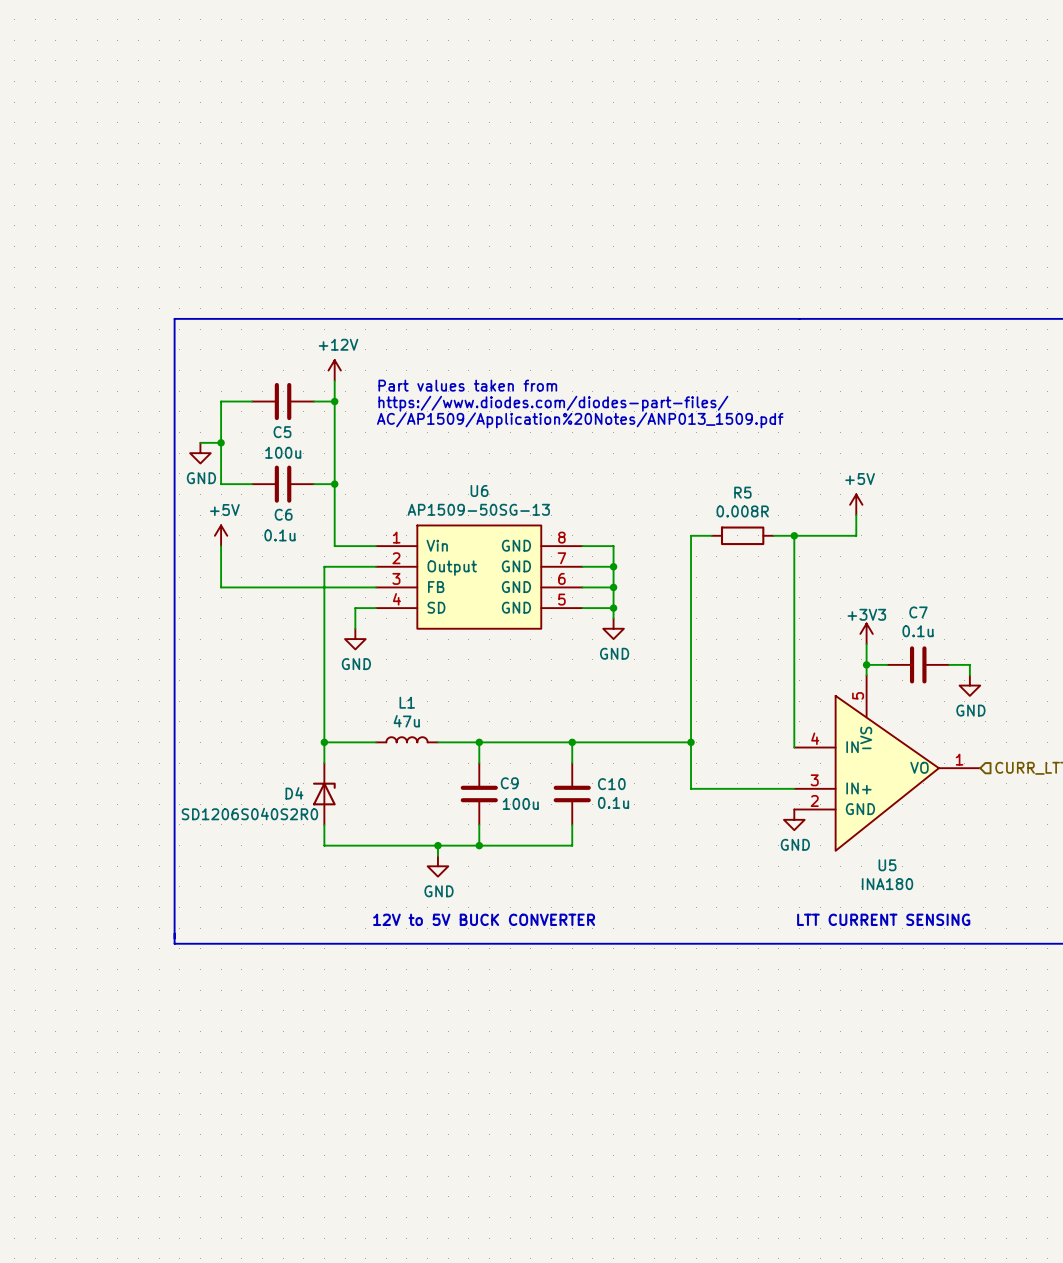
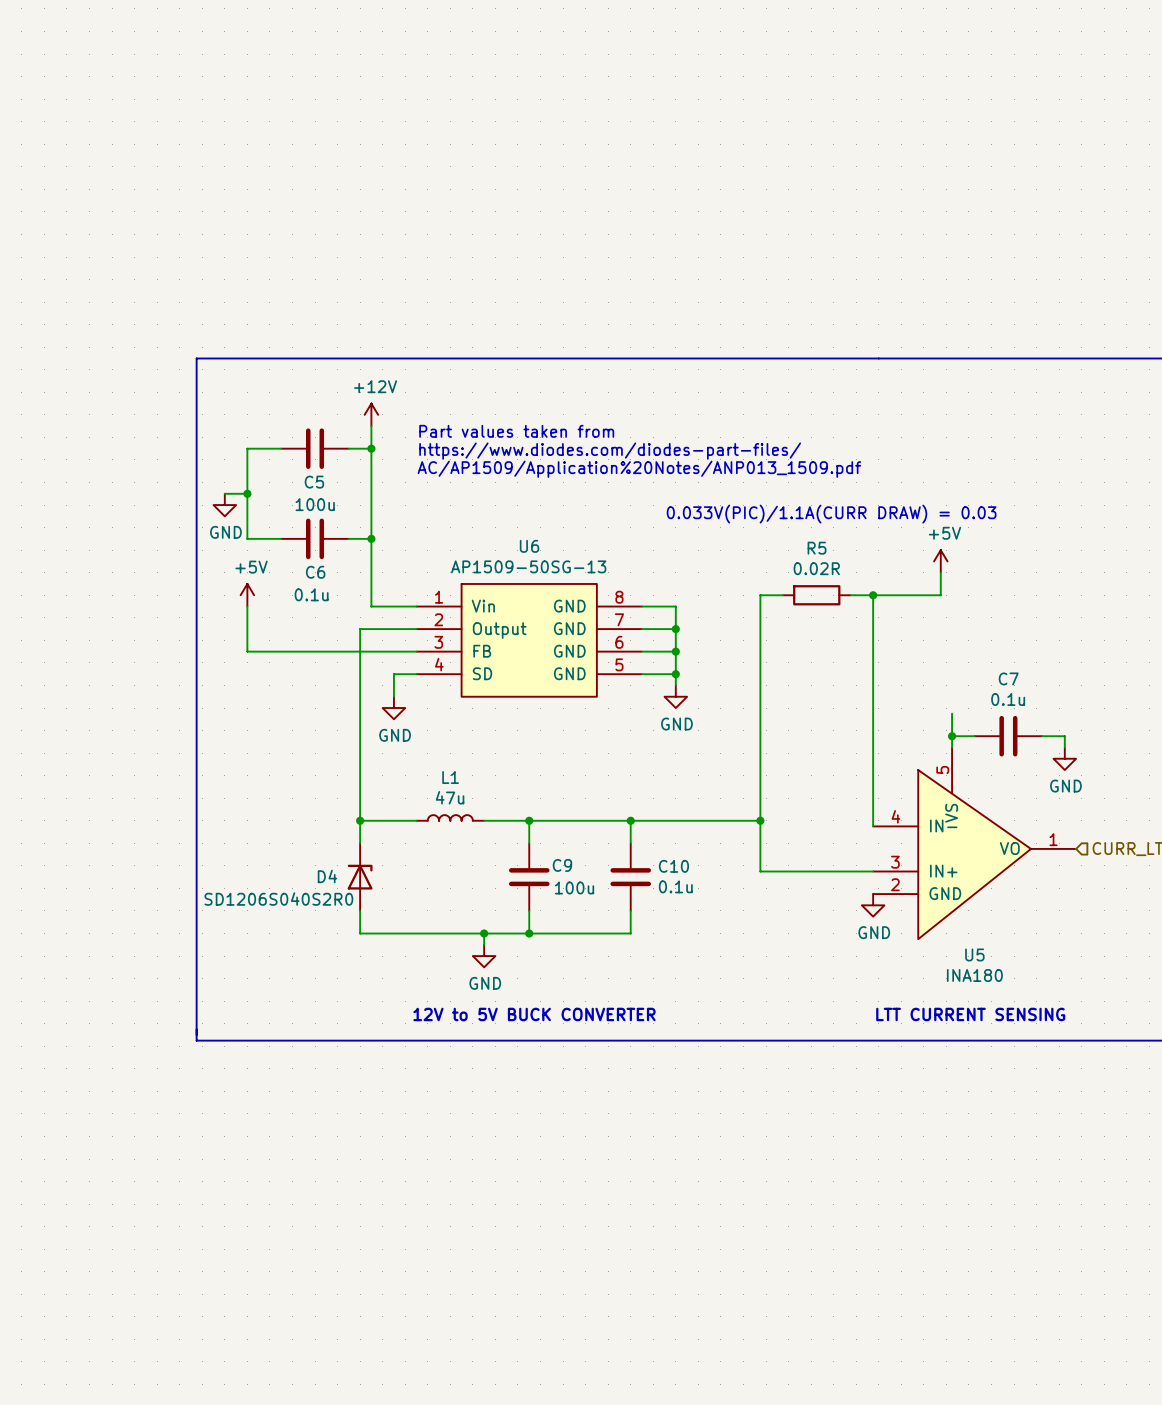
text: none -> 0.033V(PIC)/1.1A(CURR DRAW) = 0.03 (831, 514)
R5 value: 0.008R (742, 511) -> 0.02R (816, 568)
power symbol: +3V3 (866, 633) -> none

